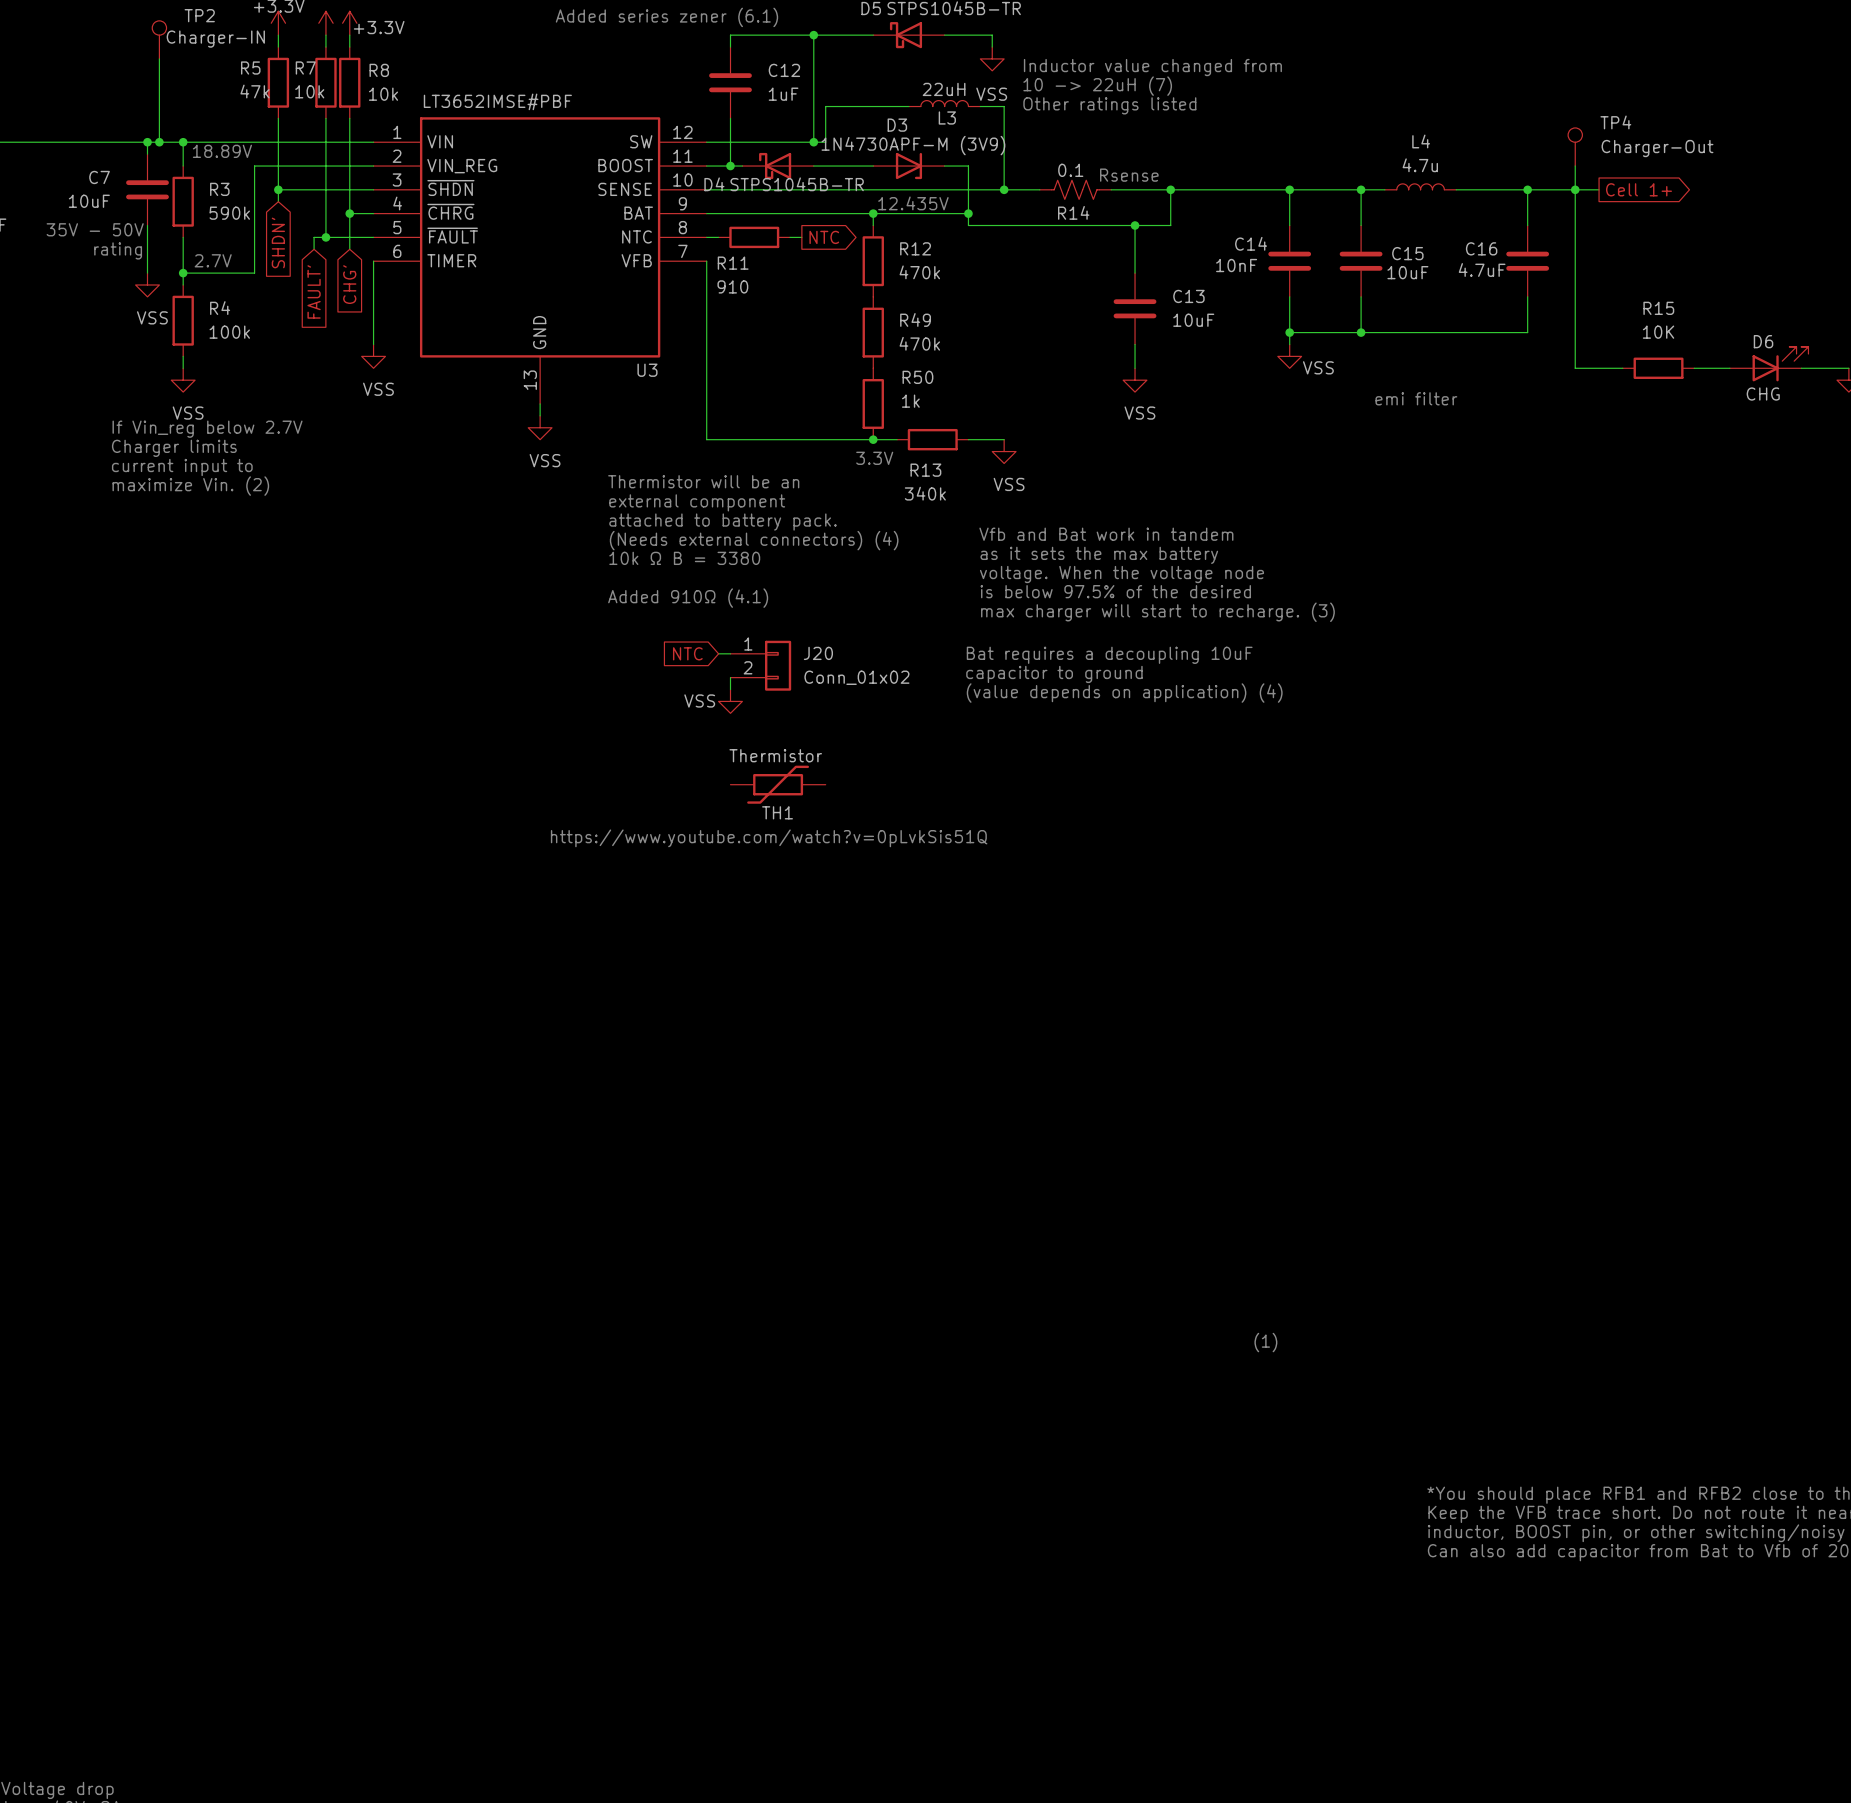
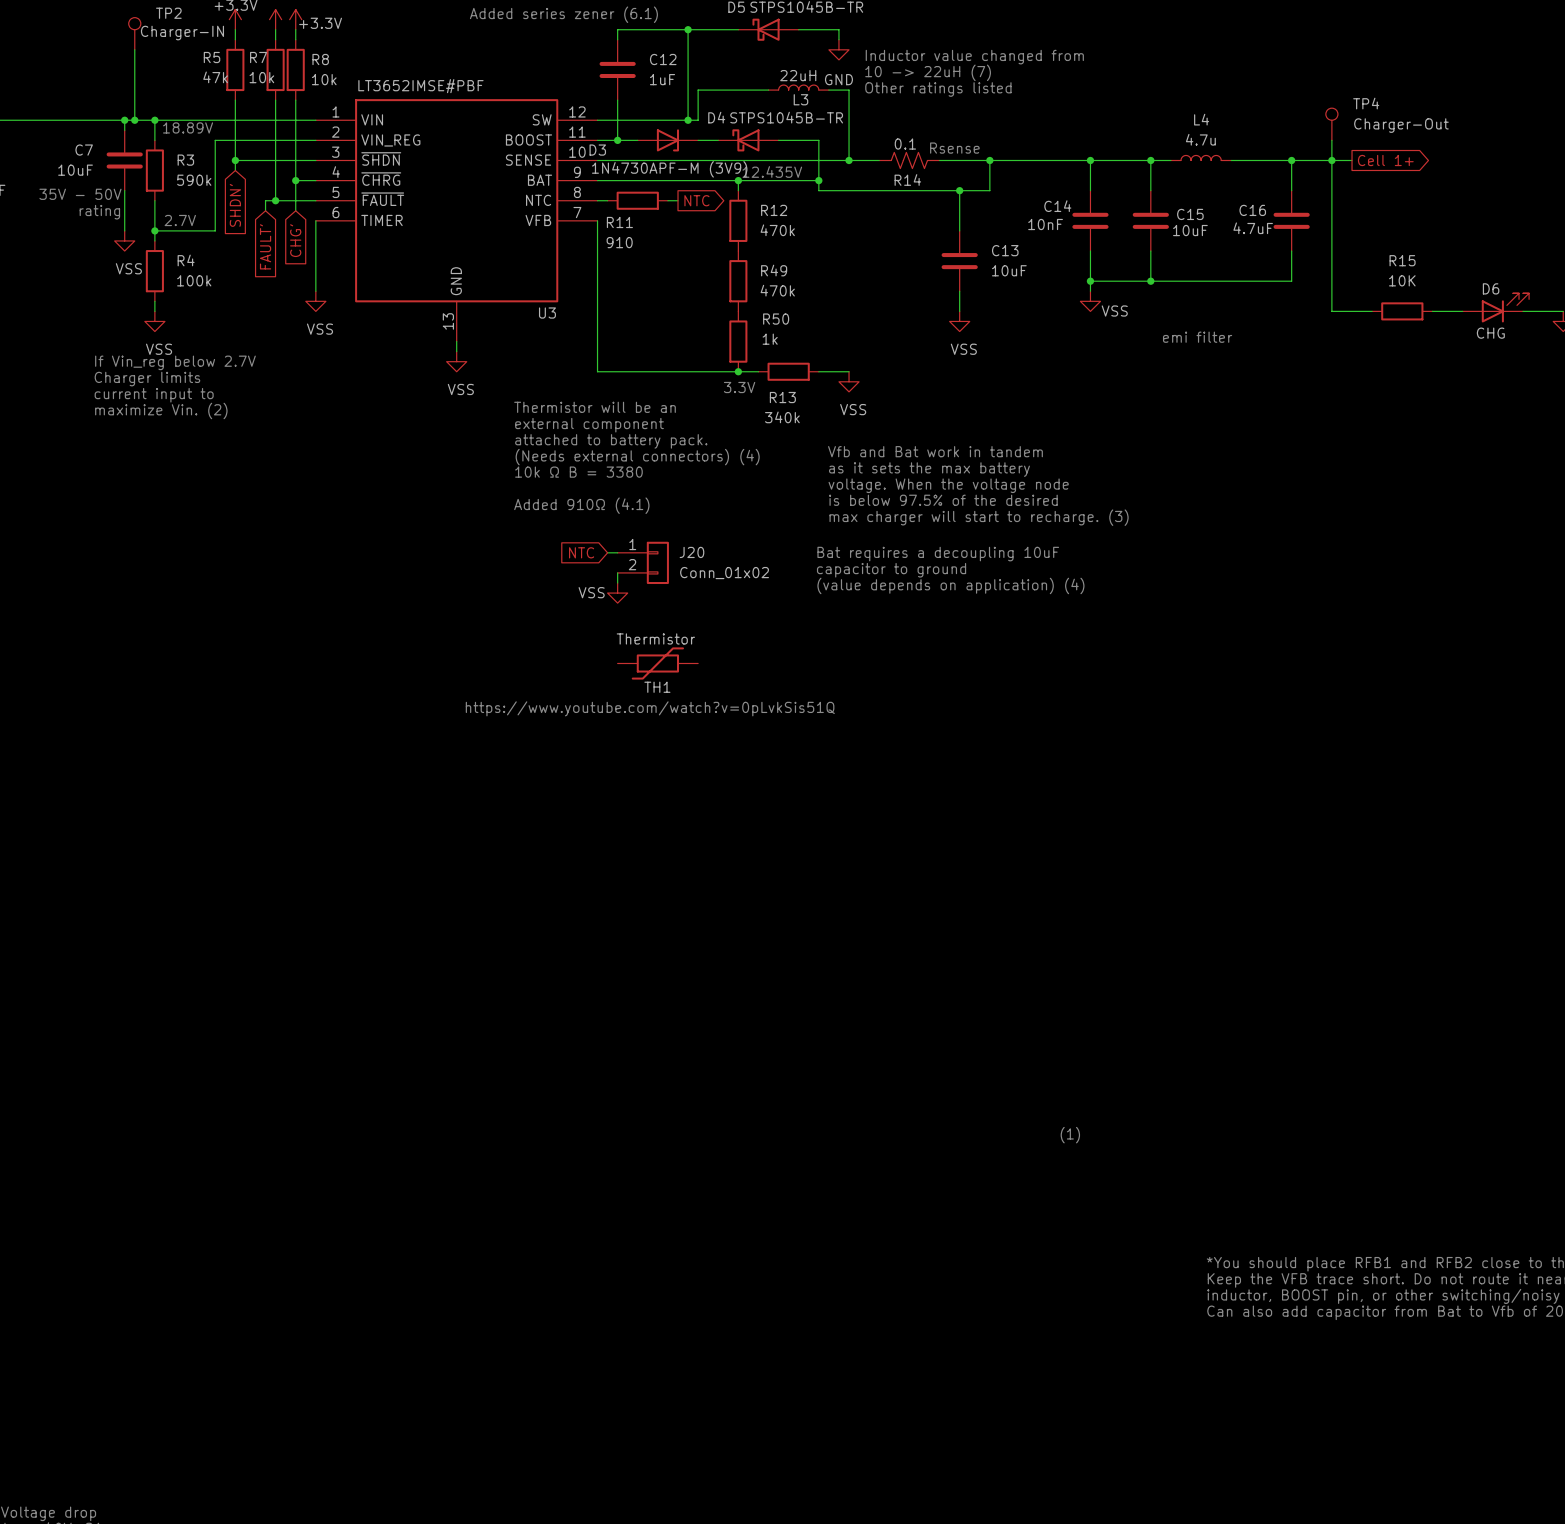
power symbol: VSS (992, 58) -> GND (838, 49)
D3 name position: D3 (897, 125) -> D3 (597, 150)
D3 value position: 1N4730APF-M (3V9) (913, 145) -> 1N4730APF-M (3V9) (669, 169)
D4 position: (778, 166) -> (748, 140)
D3 position: (908, 166) -> (667, 140)
D4 name position: D4 (714, 184) -> D4 (716, 117)
D4 value position: STPS1045B-TR (797, 184) -> STPS1045B-TR (786, 117)

